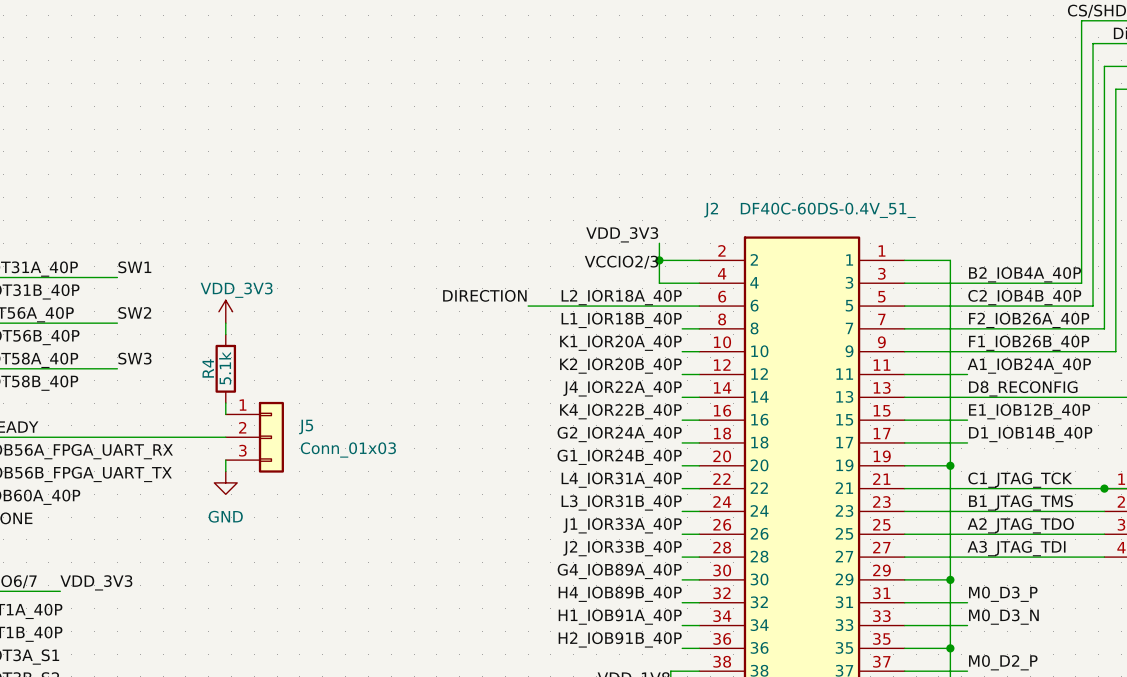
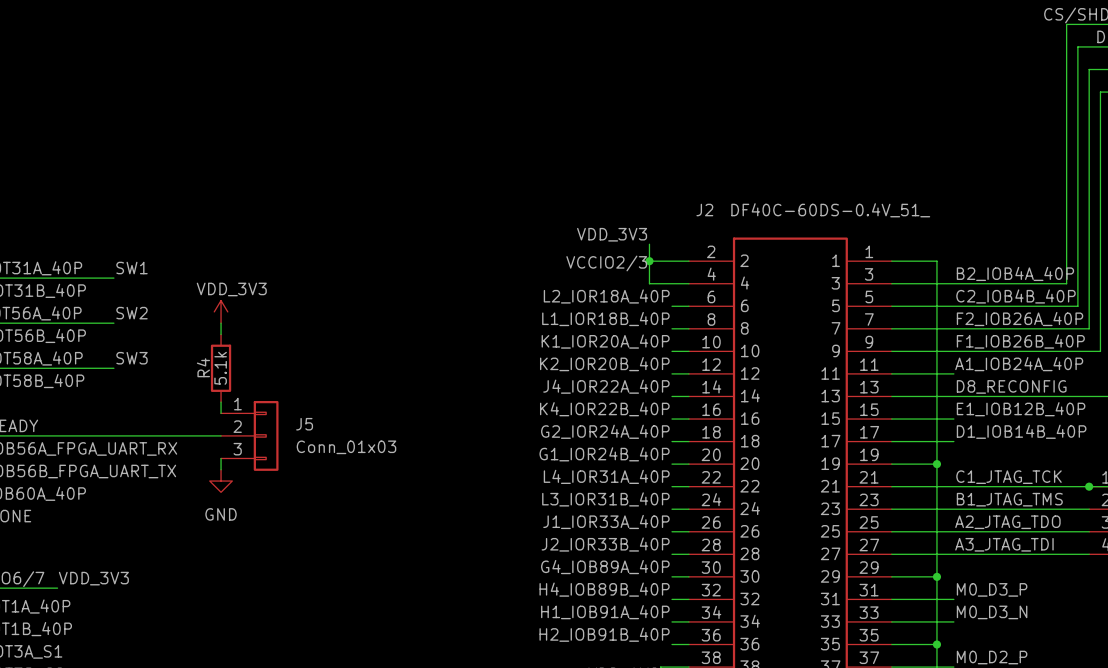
label: DIRECTION (484, 295) -> none
wire: (528, 306) (682, 306) -> none

